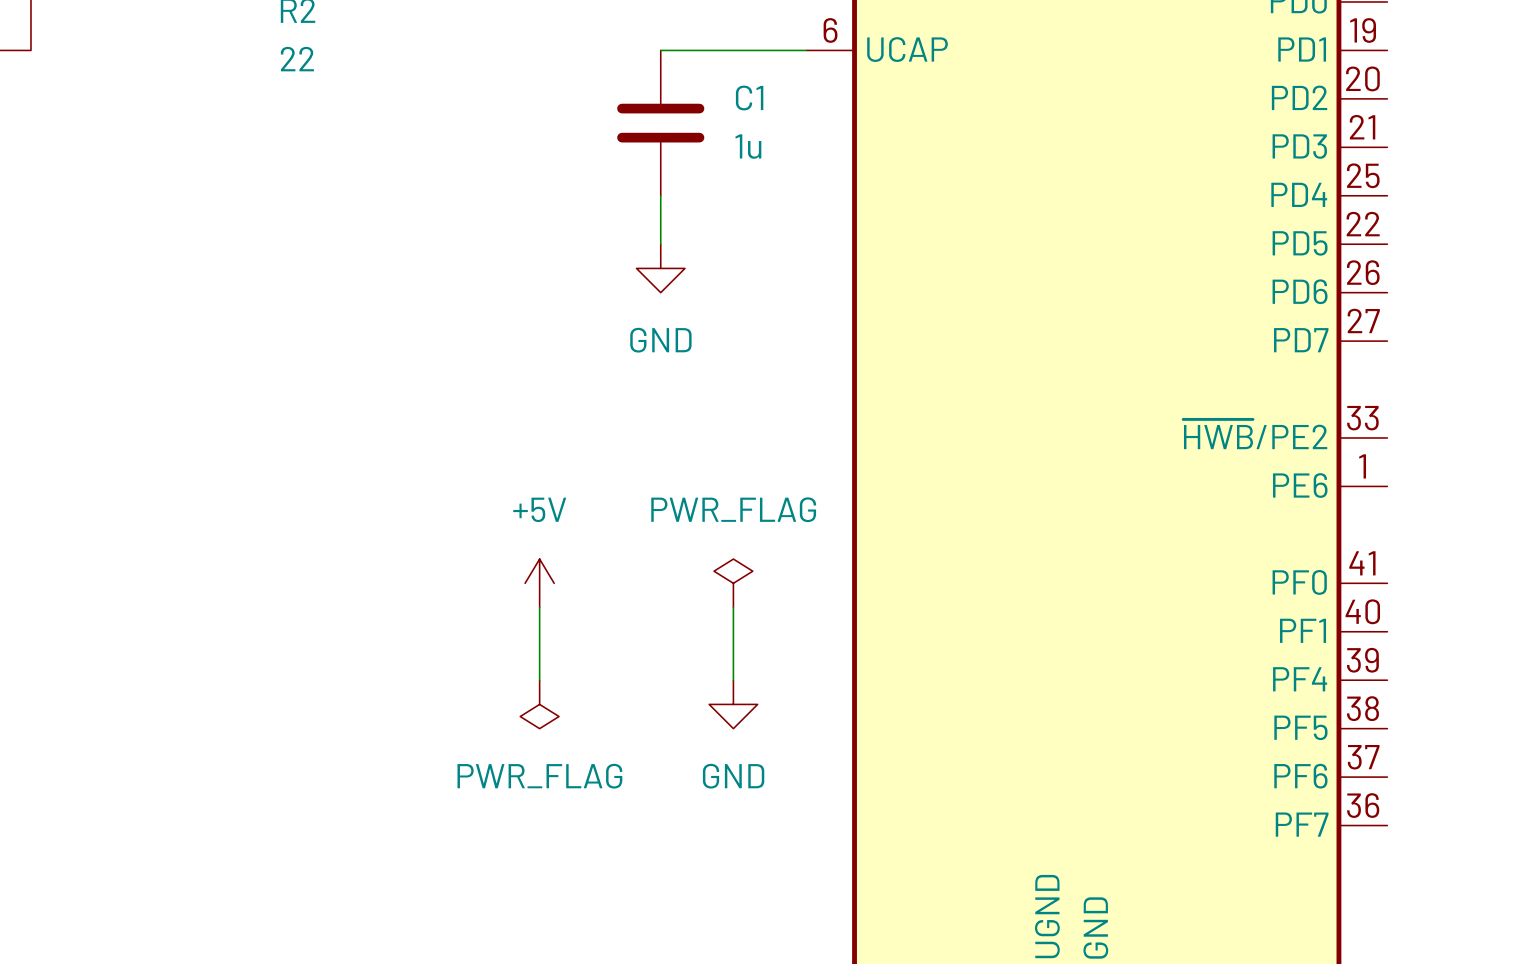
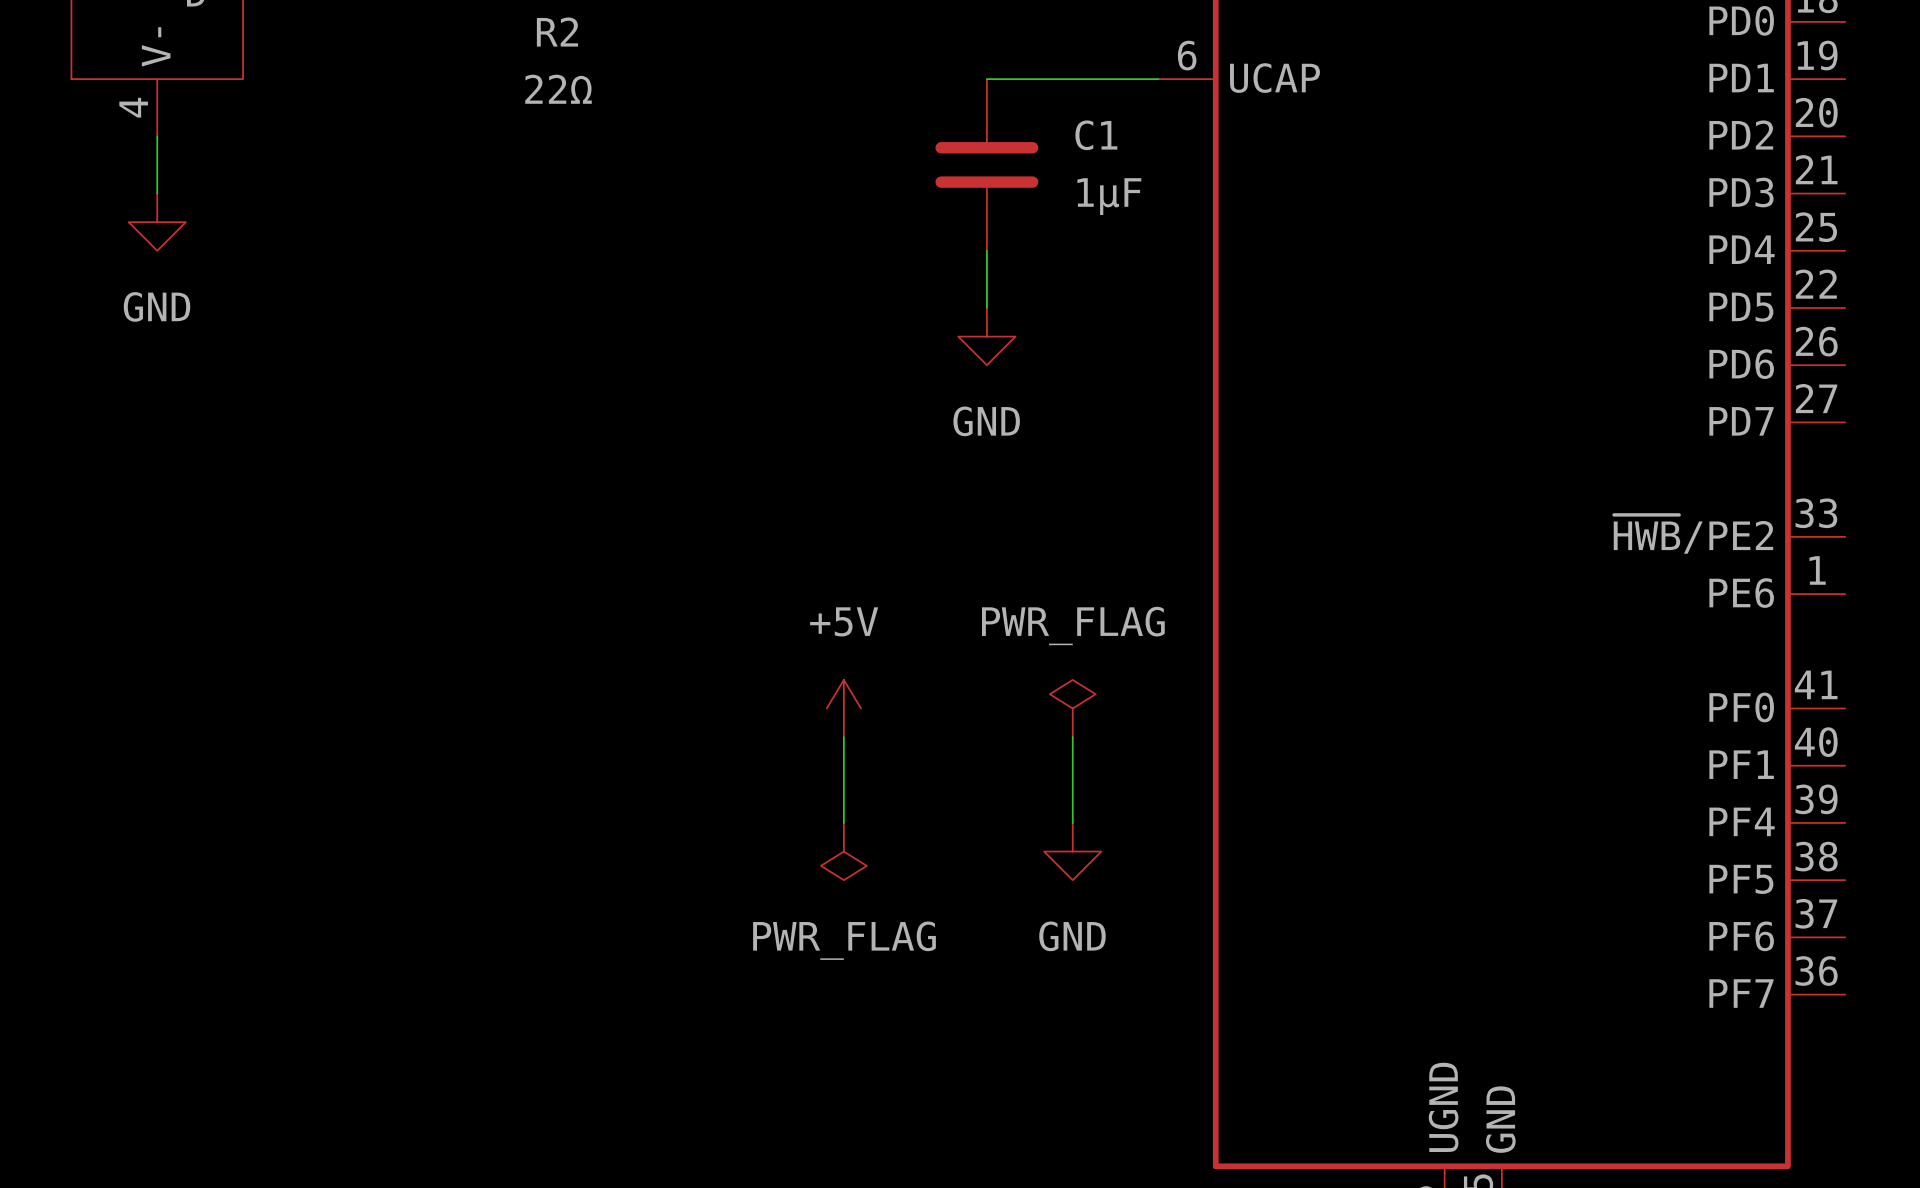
R2 value: 22 (297, 59) -> 22Ω (558, 89)
C1 value: 1u (748, 146) -> 1μF (1109, 196)

